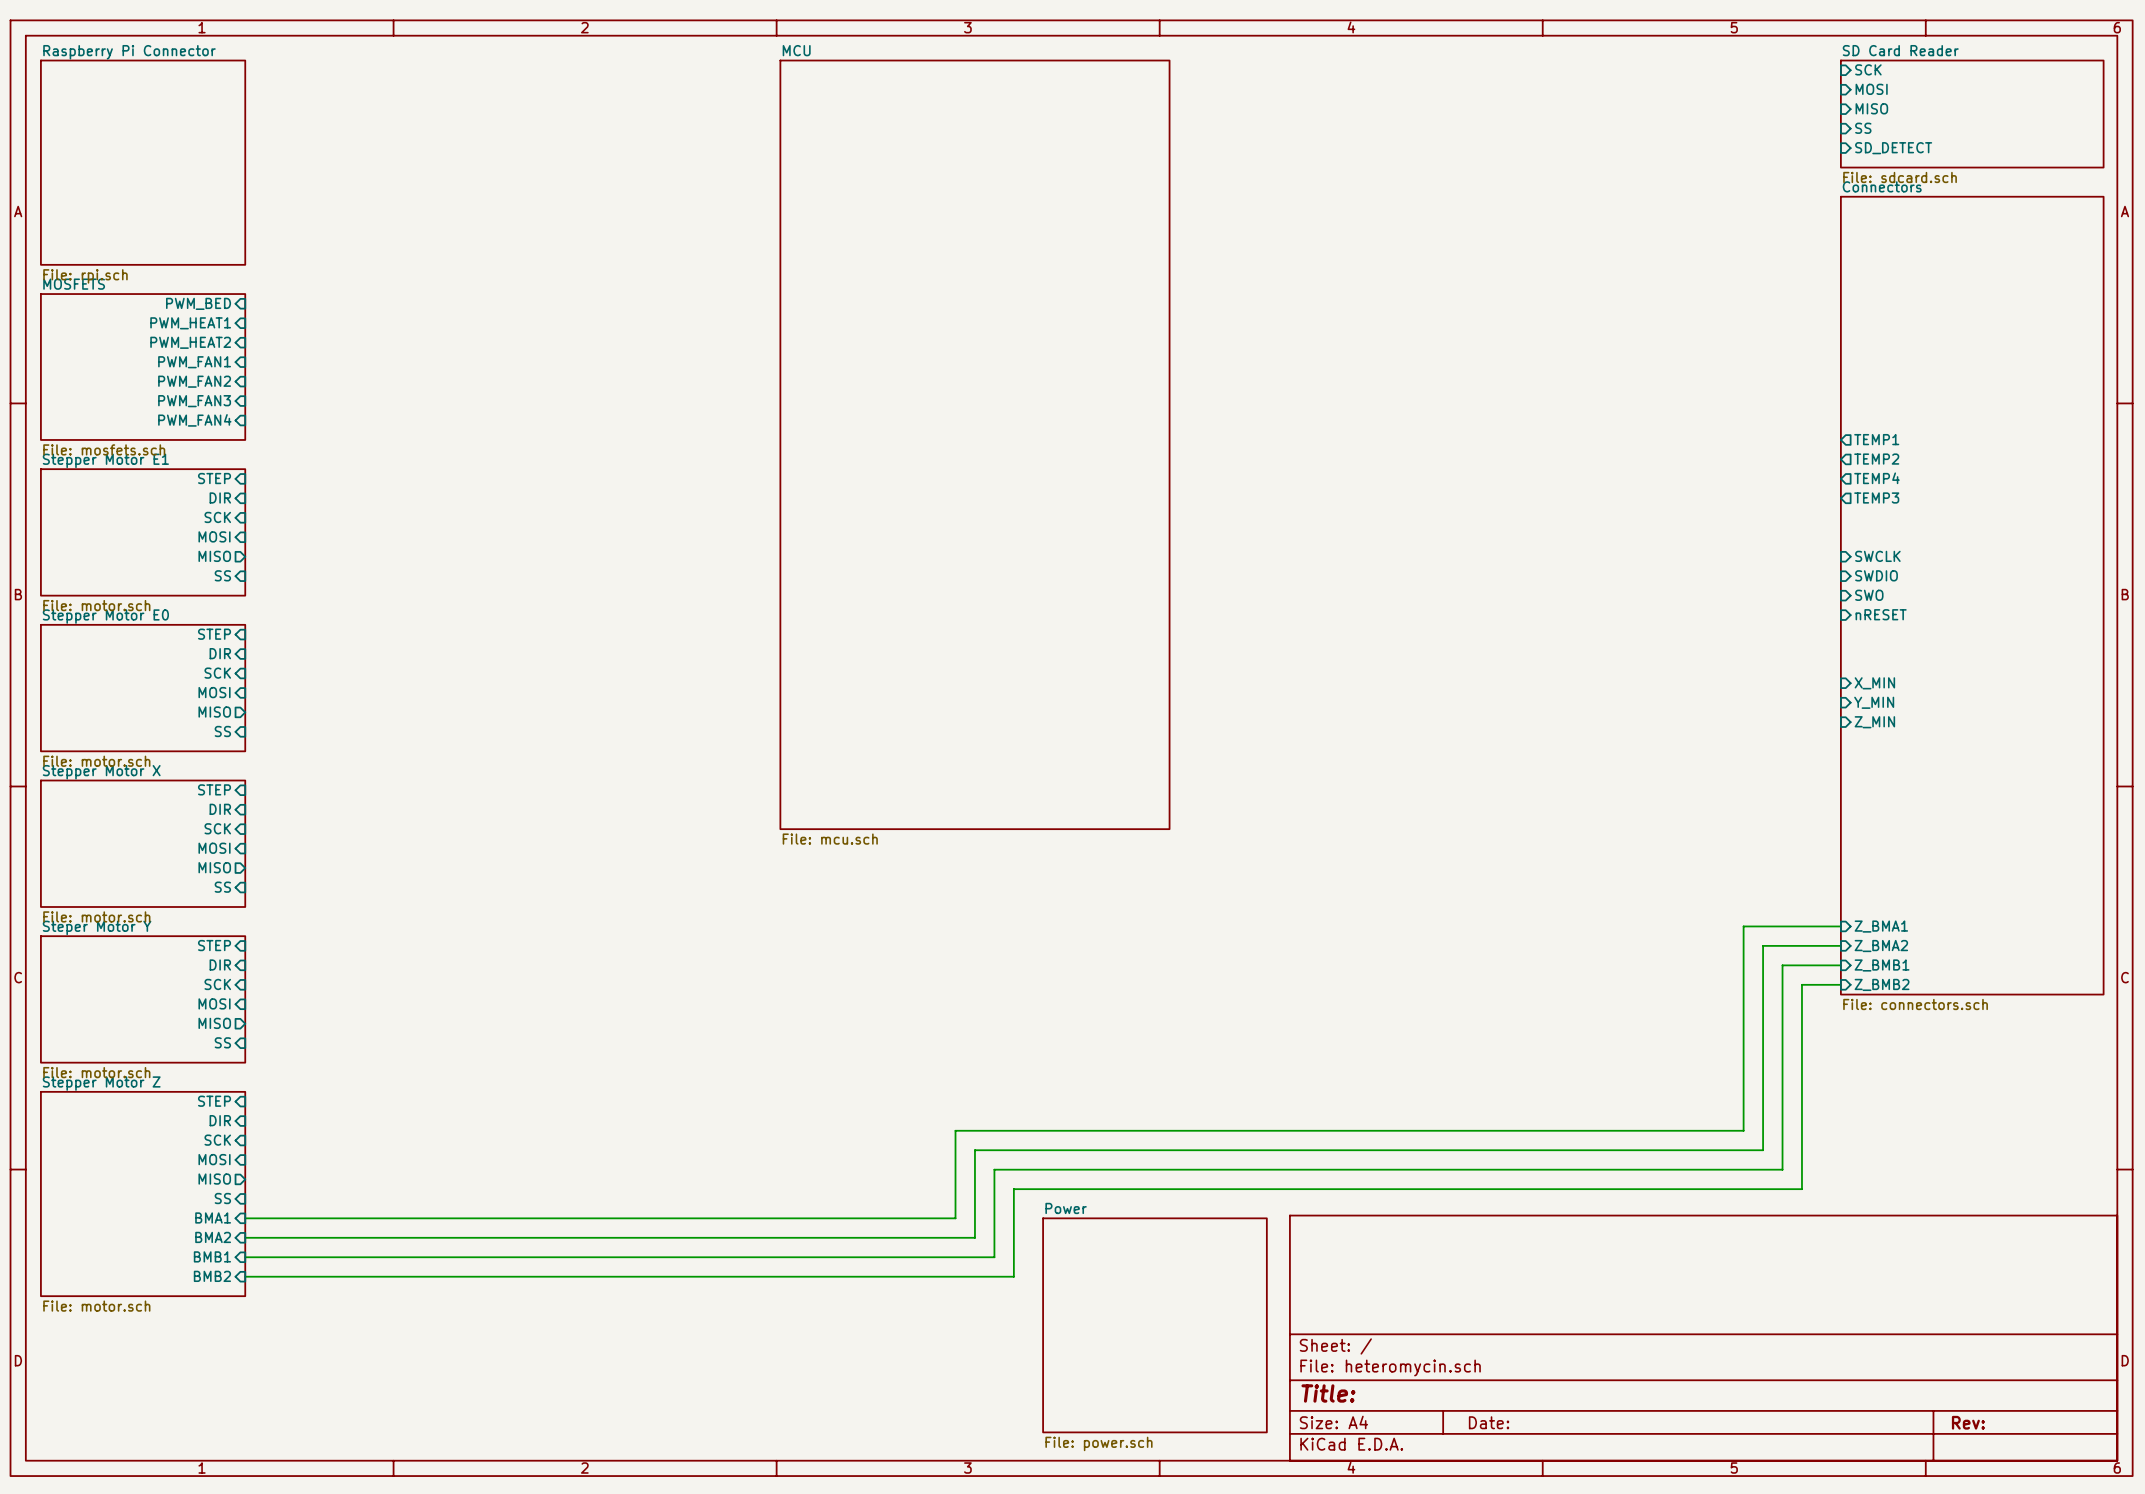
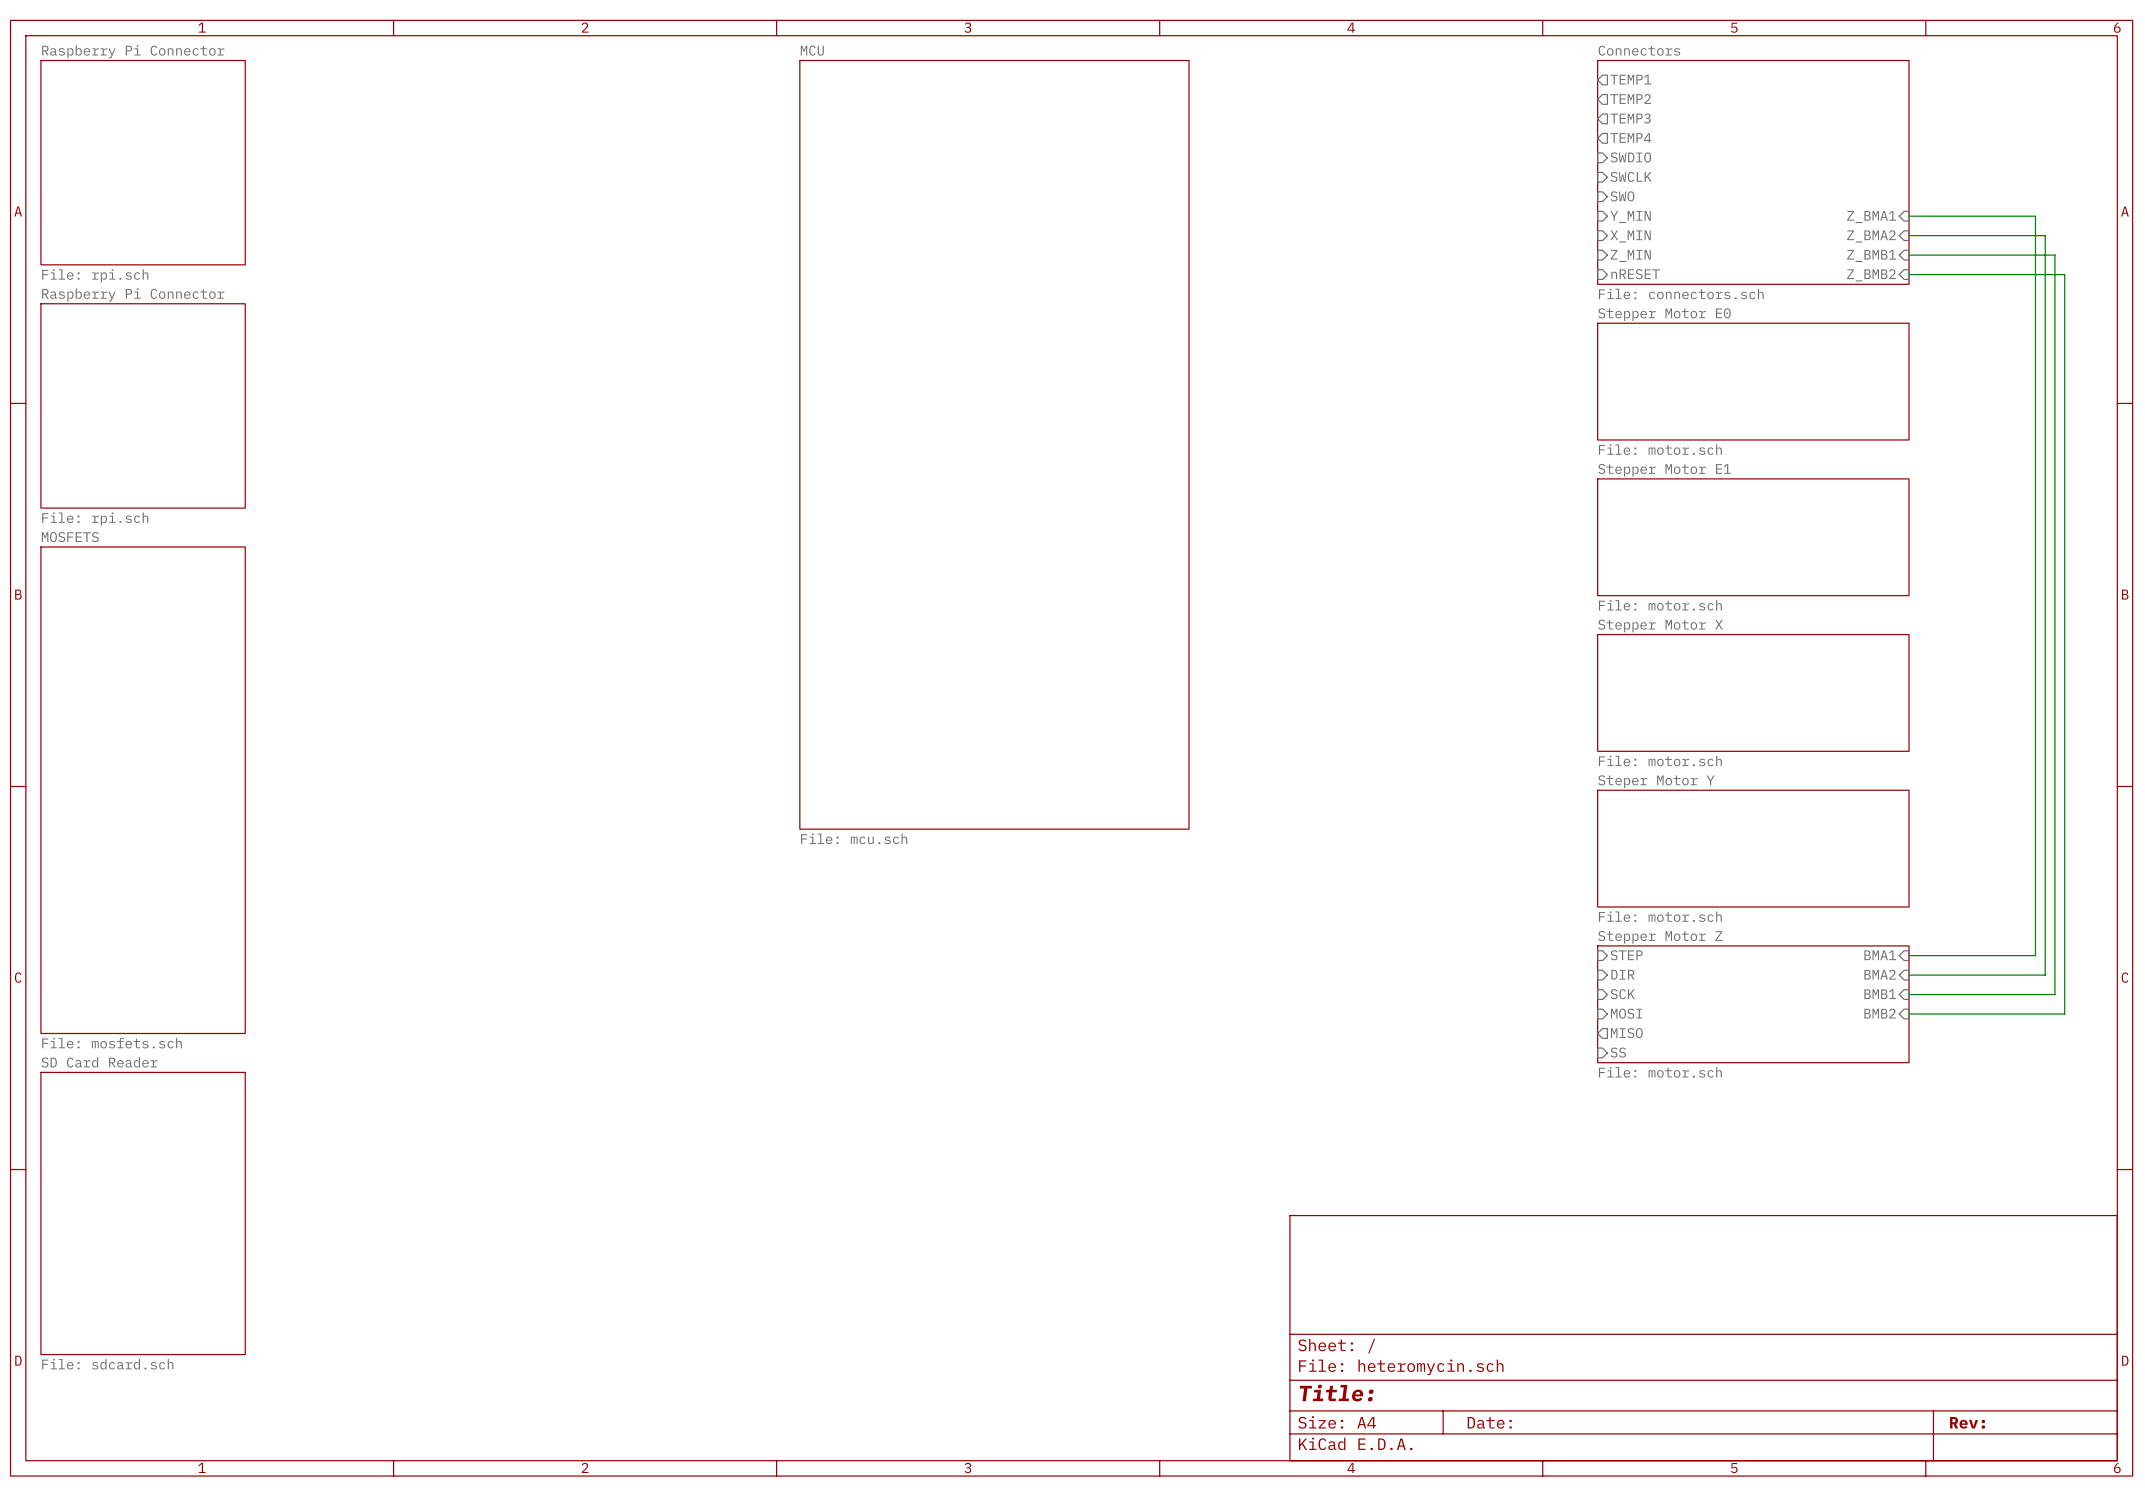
sheet pin: SCK (1868, 69) -> none
sheet pin: none -> TEMP1 (1630, 79)
sheet pin: MOSI (1871, 89) -> none
sheet pin: none -> TEMP2 (1630, 98)
sheet pin: MISO (1871, 108) -> none
sheet SD Card Reader: File: sdcard.sch (1972, 114) -> none
sheet pin: none -> TEMP3 (1630, 118)
sheet pin: SS (1863, 128) -> none
sheet pin: none -> TEMP4 (1630, 137)
sheet pin: SD_DETECT (1893, 148) -> none
sheet pin: none -> SWDIO (1630, 157)
sheet Connectors: none -> File: connectors.sch (1753, 172)
sheet pin: none -> SWCLK (1631, 176)
sheet pin: none -> SWO (1622, 196)
sheet pin: none -> Y_MIN (1630, 217)
sheet pin: none -> Z_BMA1 (1871, 217)
wire: none -> (1909, 216) (2035, 216) (2035, 955) (1909, 955)
sheet pin: none -> X_MIN (1630, 236)
sheet pin: none -> Z_BMA2 (1871, 236)
wire: none -> (1909, 235) (2045, 235) (2045, 975) (1909, 975)
sheet pin: none -> Z_MIN (1630, 255)
sheet pin: none -> Z_BMB1 (1871, 255)
wire: none -> (1909, 255) (2054, 255) (2054, 994) (1909, 994)
sheet pin: none -> nRESET (1635, 274)
sheet pin: none -> Z_BMB2 (1871, 275)
wire: none -> (1909, 274) (2064, 274) (2064, 1014) (1909, 1014)
sheet pin: PWM_BED (198, 303) -> none
sheet pin: PWM_HEAT1 (190, 323) -> none
sheet pin: PWM_HEAT2 (190, 342) -> none
sheet pin: PWM_FAN1 (194, 362) -> none
sheet MOSFETS: File: mosfets.sch (143, 367) -> none
sheet pin: PWM_FAN2 (194, 381) -> none
sheet pin: PWM_FAN3 (194, 401) -> none
sheet Raspberry Pi Connector: none -> File: rpi.sch (143, 405)
sheet pin: PWM_FAN4 (194, 420) -> none
sheet pin: TEMP1 (1876, 439) -> none
sheet MCU position: (974, 444) -> (994, 444)
sheet pin: TEMP2 (1876, 459) -> none
sheet Stepper Motor E1 name position: Stepper Motor E1 (105, 460) -> Stepper Motor E1 (1664, 470)
sheet Stepper Motor E1 shape: [40, 469, 246, 596] -> [1597, 478, 1910, 596]
sheet pin: STEP (214, 478) -> none
sheet pin: TEMP4 (1876, 478) -> none
sheet pin: DIR (220, 497) -> none
sheet pin: TEMP3 (1876, 497) -> none
sheet pin: SCK (217, 517) -> none
sheet pin: MOSI (214, 536) -> none
sheet pin: MISO (214, 556) -> none
sheet pin: SWCLK (1877, 556) -> none
sheet pin: SS (222, 575) -> none
sheet pin: SWDIO (1876, 575) -> none
sheet pin: SWO (1869, 595) -> none
sheet Connectors: File: connectors.sch (1972, 595) -> none
sheet Stepper Motor E1 value position: File: motor.sch (96, 605) -> File: motor.sch (1660, 605)
sheet pin: nRESET (1881, 614) -> none
sheet Stepper Motor E0 name position: Stepper Motor E0 (105, 616) -> Stepper Motor E0 (1664, 314)
sheet Stepper Motor E0 shape: [40, 624, 246, 752] -> [1597, 323, 1910, 440]
sheet pin: STEP (214, 634) -> none
sheet pin: DIR (220, 653) -> none
sheet pin: SCK (217, 673) -> none
sheet pin: X_MIN (1874, 683) -> none
sheet pin: MOSI (214, 692) -> none
sheet Stepper Motor X: none -> File: motor.sch (1753, 692)
sheet pin: Y_MIN (1874, 702) -> none
sheet pin: MISO (214, 712) -> none
sheet pin: Z_MIN (1874, 722) -> none
sheet pin: SS (222, 731) -> none
sheet Stepper Motor E0 value position: File: motor.sch (96, 761) -> File: motor.sch (1660, 449)
sheet pin: STEP (214, 789) -> none
sheet MOSFETS: none -> File: mosfets.sch (143, 790)
sheet pin: DIR (220, 809) -> none
sheet pin: SCK (217, 828) -> none
sheet Stepper Motor X: File: motor.sch (143, 843) -> none
sheet pin: MOSI (214, 848) -> none
sheet Steper Motor Y: none -> File: motor.sch (1753, 848)
sheet pin: MISO (214, 867) -> none
sheet pin: SS (222, 887) -> none
wire: (1840, 926) (1743, 926) (1743, 1130) (955, 1130) (955, 1218) (245, 1218) -> none
sheet pin: Z_BMA1 (1881, 926) -> none
sheet pin: STEP (214, 945) -> none
wire: (1840, 945) (1763, 945) (1763, 1150) (974, 1150) (974, 1237) (245, 1237) -> none
sheet pin: Z_BMA2 (1881, 946) -> none
sheet pin: none -> STEP (1626, 955)
sheet pin: none -> BMA1 (1880, 955)
sheet pin: DIR (220, 965) -> none
wire: (1840, 965) (1782, 965) (1782, 1169) (994, 1169) (994, 1257) (245, 1257) -> none
sheet pin: Z_BMB1 (1882, 965) -> none
sheet pin: none -> DIR (1622, 974)
sheet pin: none -> BMA2 (1880, 974)
sheet pin: SCK (217, 984) -> none
wire: (1840, 984) (1801, 984) (1801, 1189) (1013, 1189) (1013, 1276) (245, 1276) -> none
sheet pin: Z_BMB2 (1882, 984) -> none
sheet pin: none -> SCK (1622, 994)
sheet pin: none -> BMB1 (1880, 994)
sheet Steper Motor Y: File: motor.sch (143, 999) -> none
sheet pin: MOSI (214, 1003) -> none
sheet Stepper Motor Z: none -> File: motor.sch (1753, 1004)
sheet pin: none -> MOSI (1626, 1013)
sheet pin: none -> BMB2 (1880, 1013)
sheet pin: MISO (214, 1023) -> none
sheet pin: none -> MISO (1626, 1033)
sheet pin: SS (222, 1042) -> none
sheet pin: none -> SS (1618, 1052)
sheet pin: STEP (214, 1101) -> none
sheet pin: DIR (220, 1120) -> none
sheet pin: SCK (217, 1140) -> none
sheet pin: MOSI (214, 1159) -> none
sheet pin: MISO (214, 1179) -> none
sheet Stepper Motor Z: File: motor.sch (143, 1194) -> none
sheet pin: SS (222, 1198) -> none
sheet SD Card Reader: none -> File: sdcard.sch (143, 1213)
sheet pin: BMA1 (213, 1217) -> none
sheet pin: BMA2 (213, 1237) -> none
sheet pin: BMB1 (212, 1256) -> none
sheet pin: BMB2 (212, 1276) -> none
sheet Power: File: power.sch (1154, 1325) -> none

